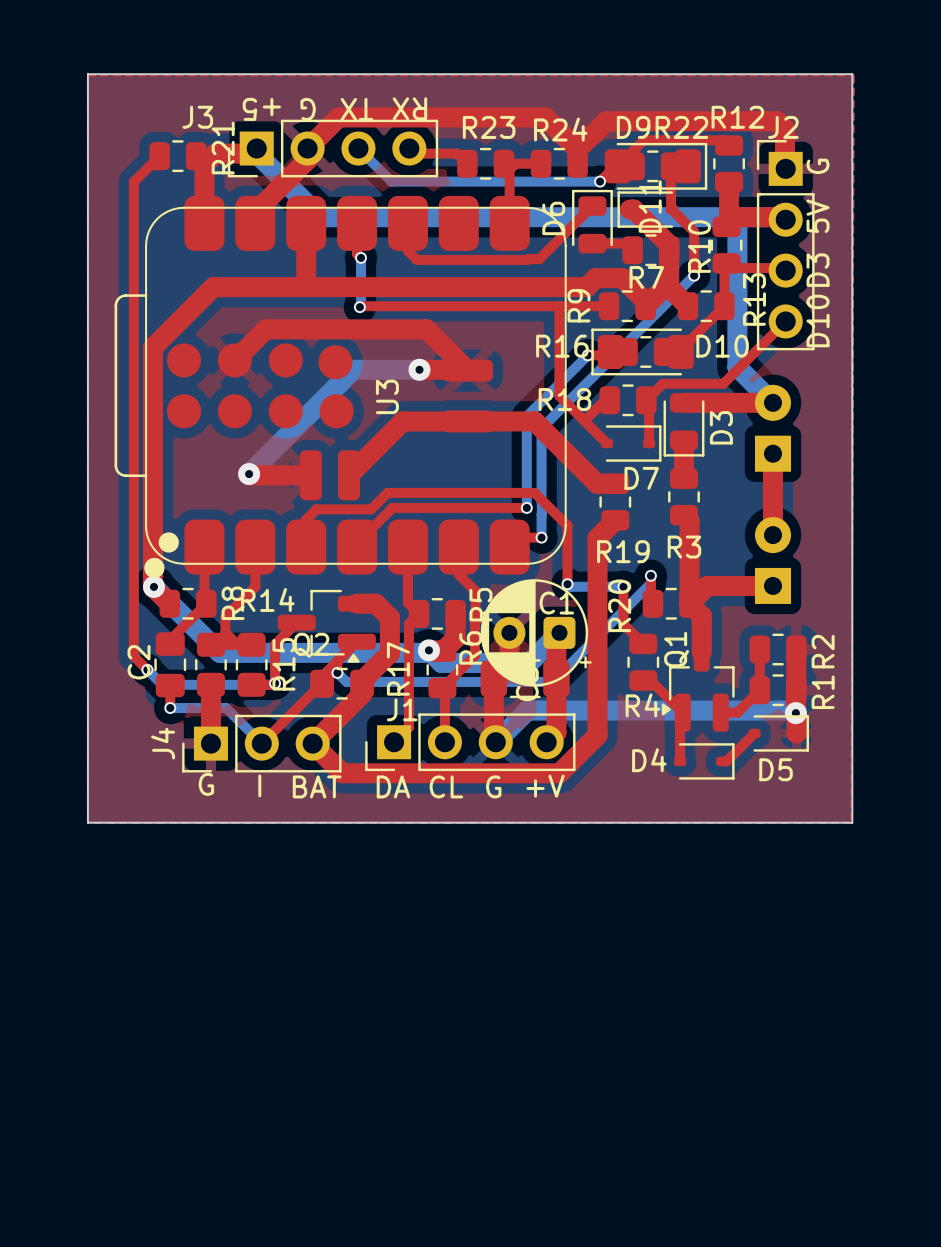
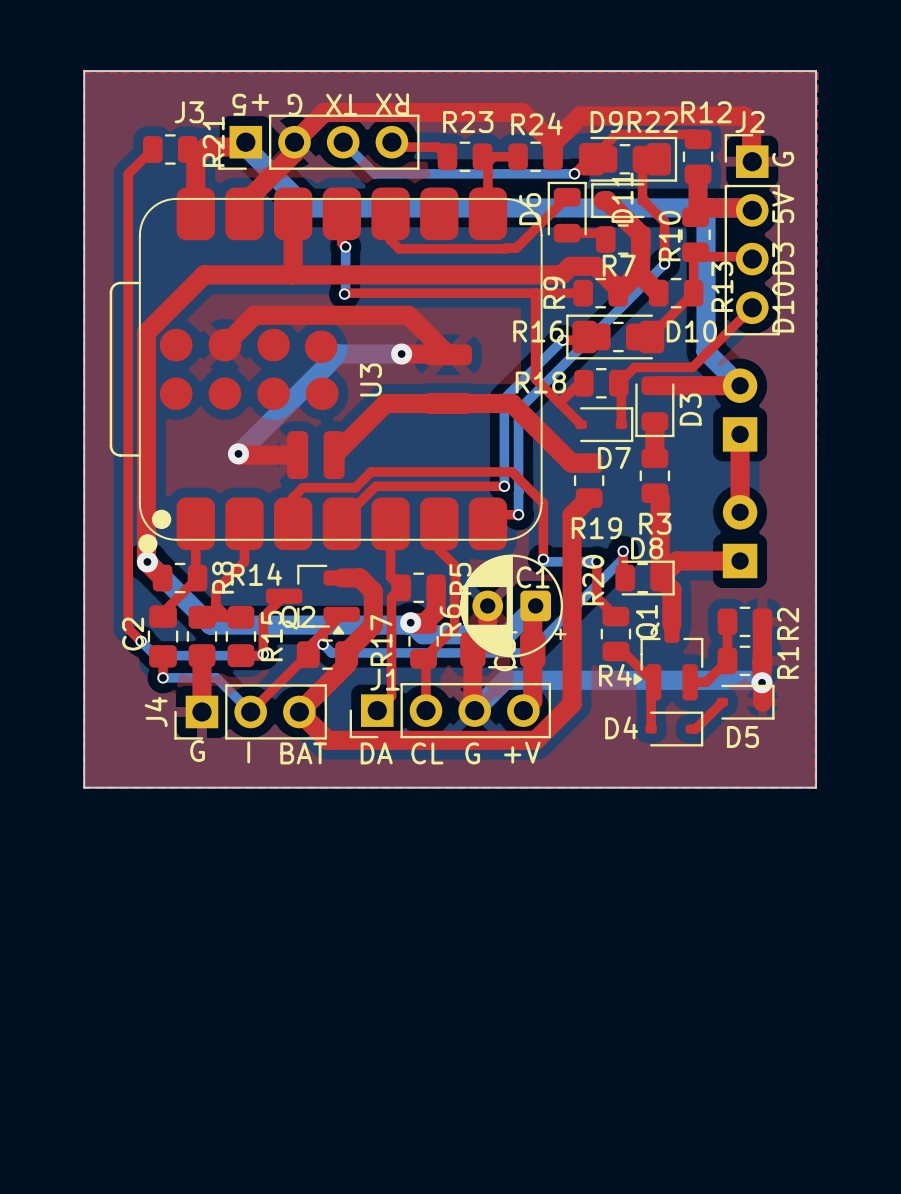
D8: none -> (645, 578)

